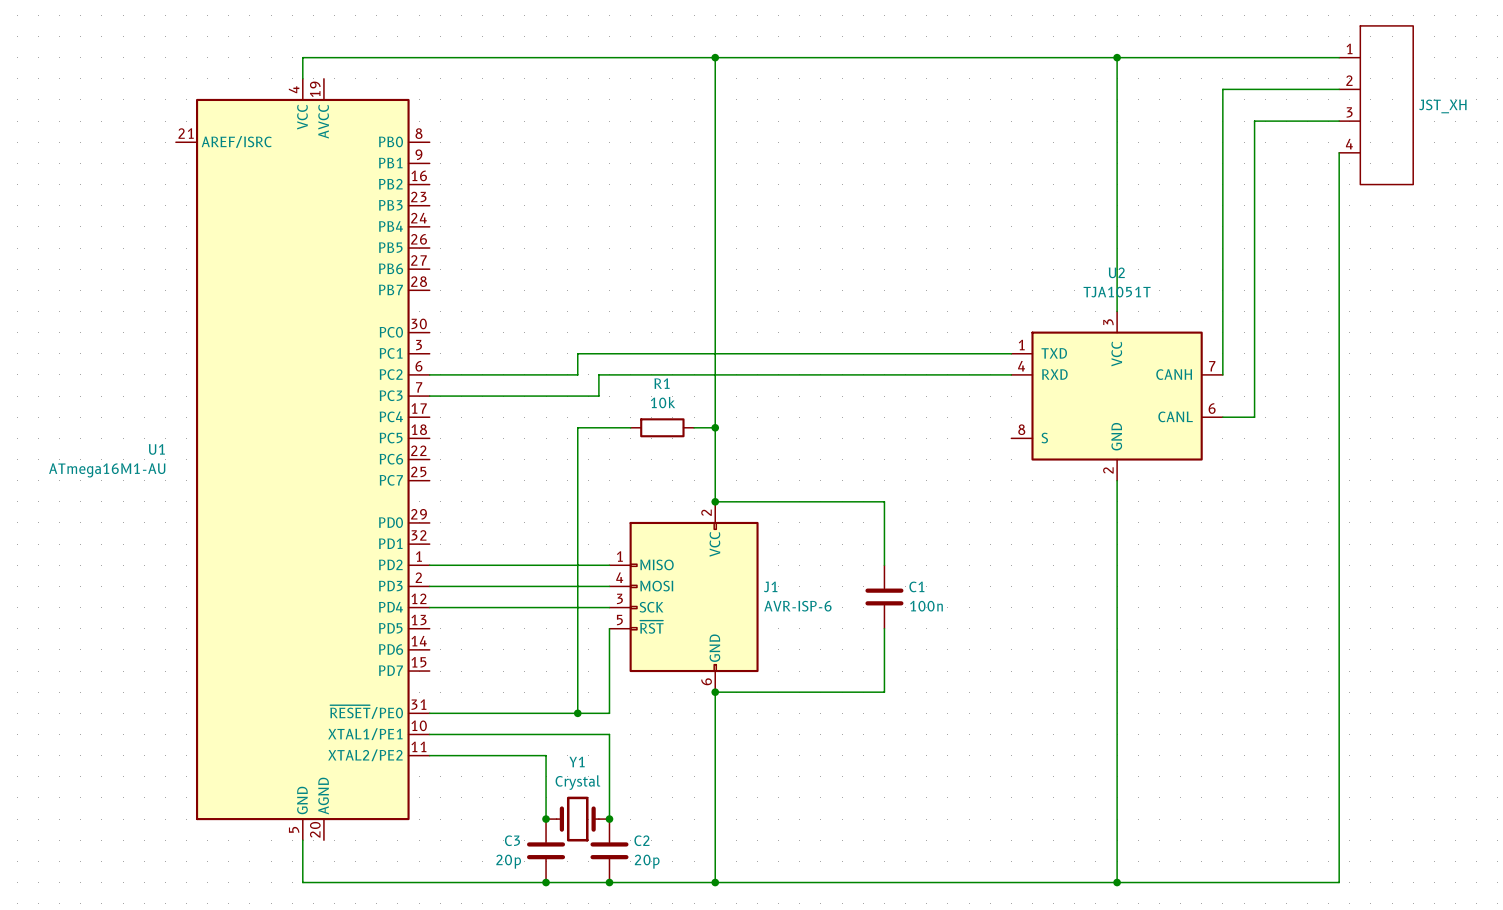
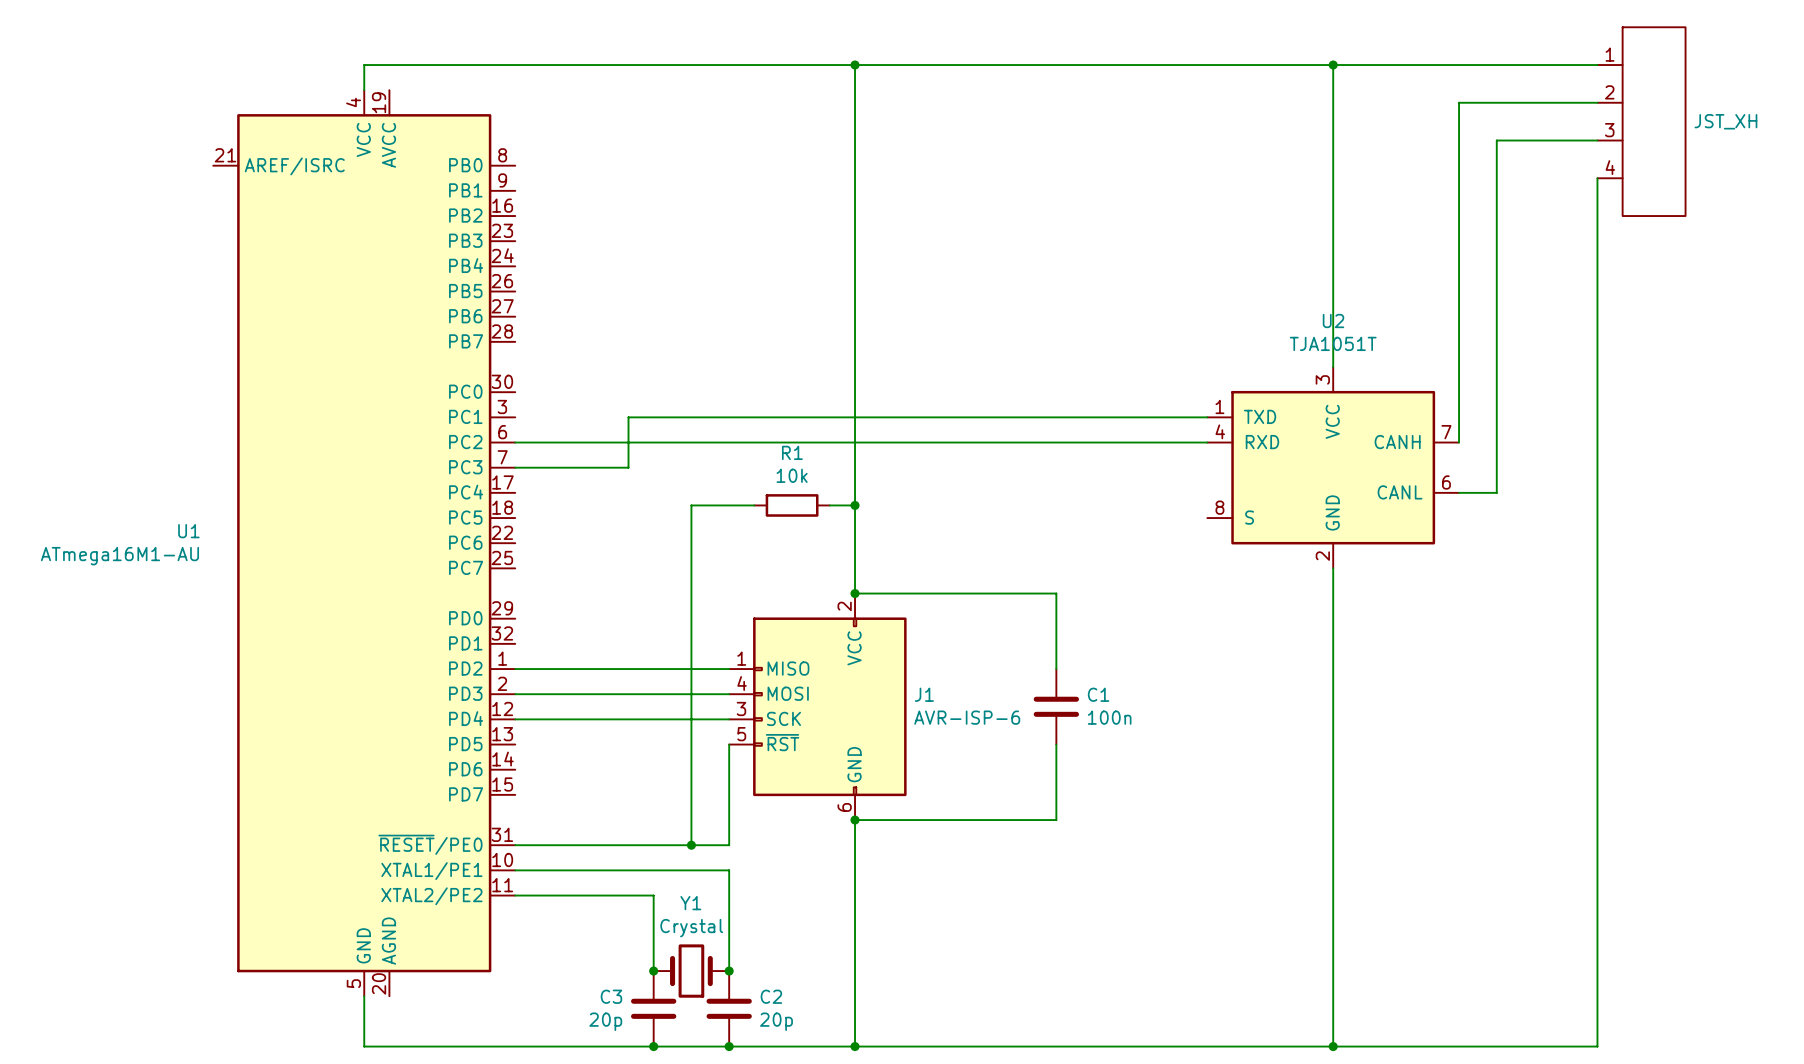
wire: (577, 353) (577, 374) -> (716, 442) (691, 442)
wire: (598, 374) (598, 396) (524, 396) -> (691, 417) (628, 417) (628, 467)

